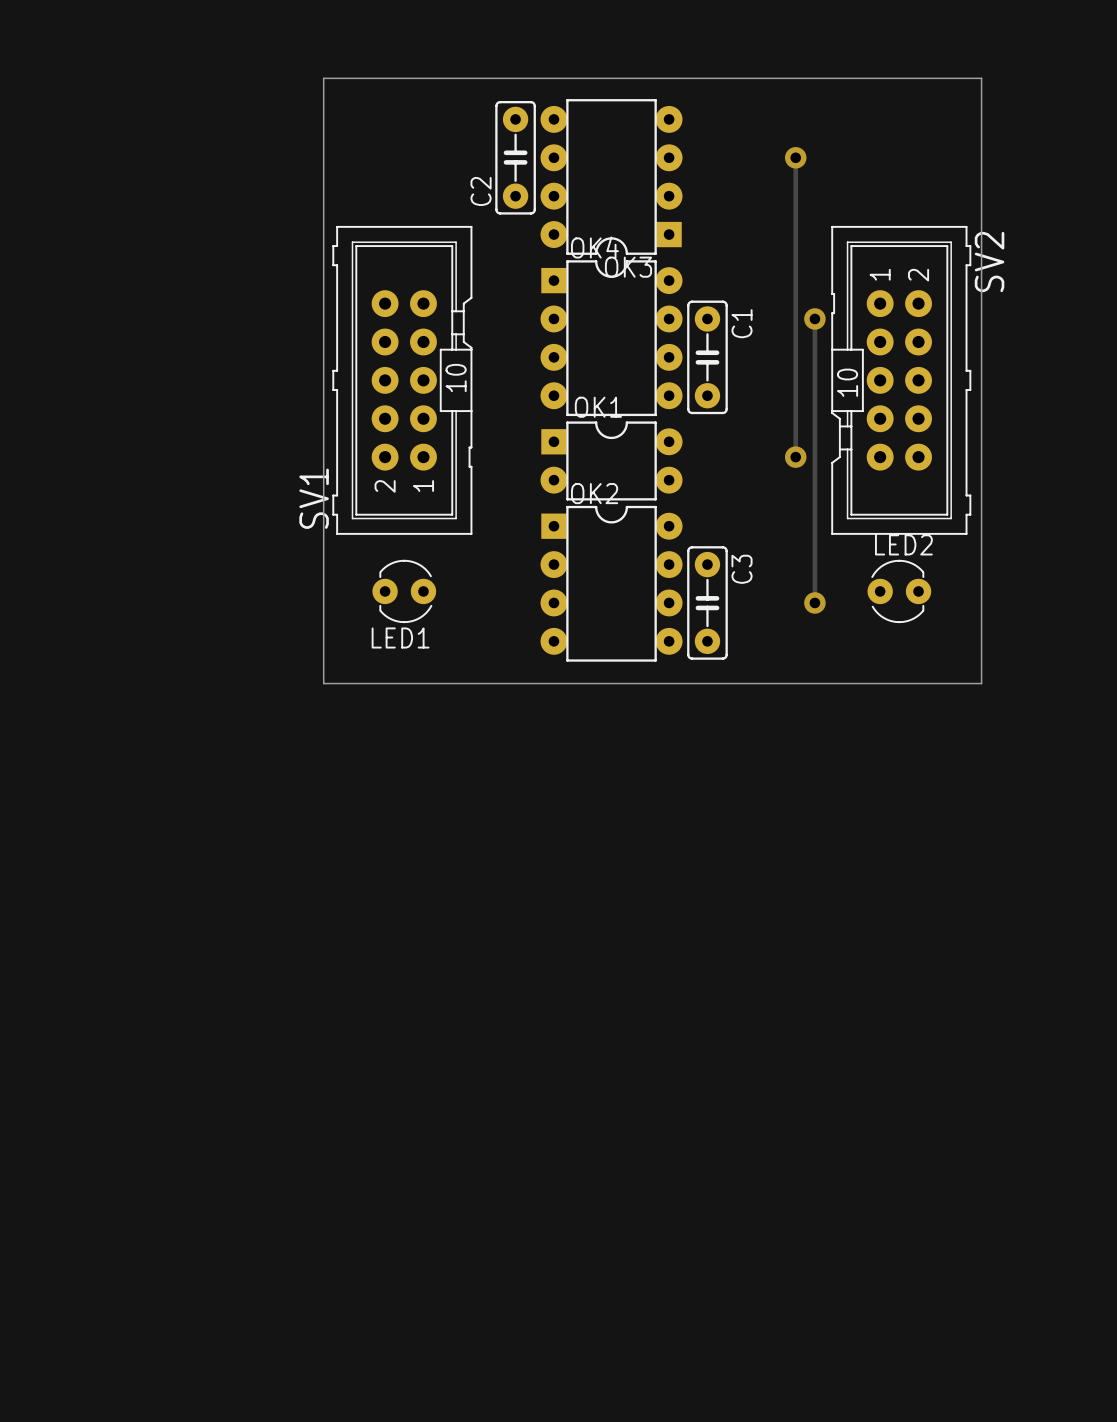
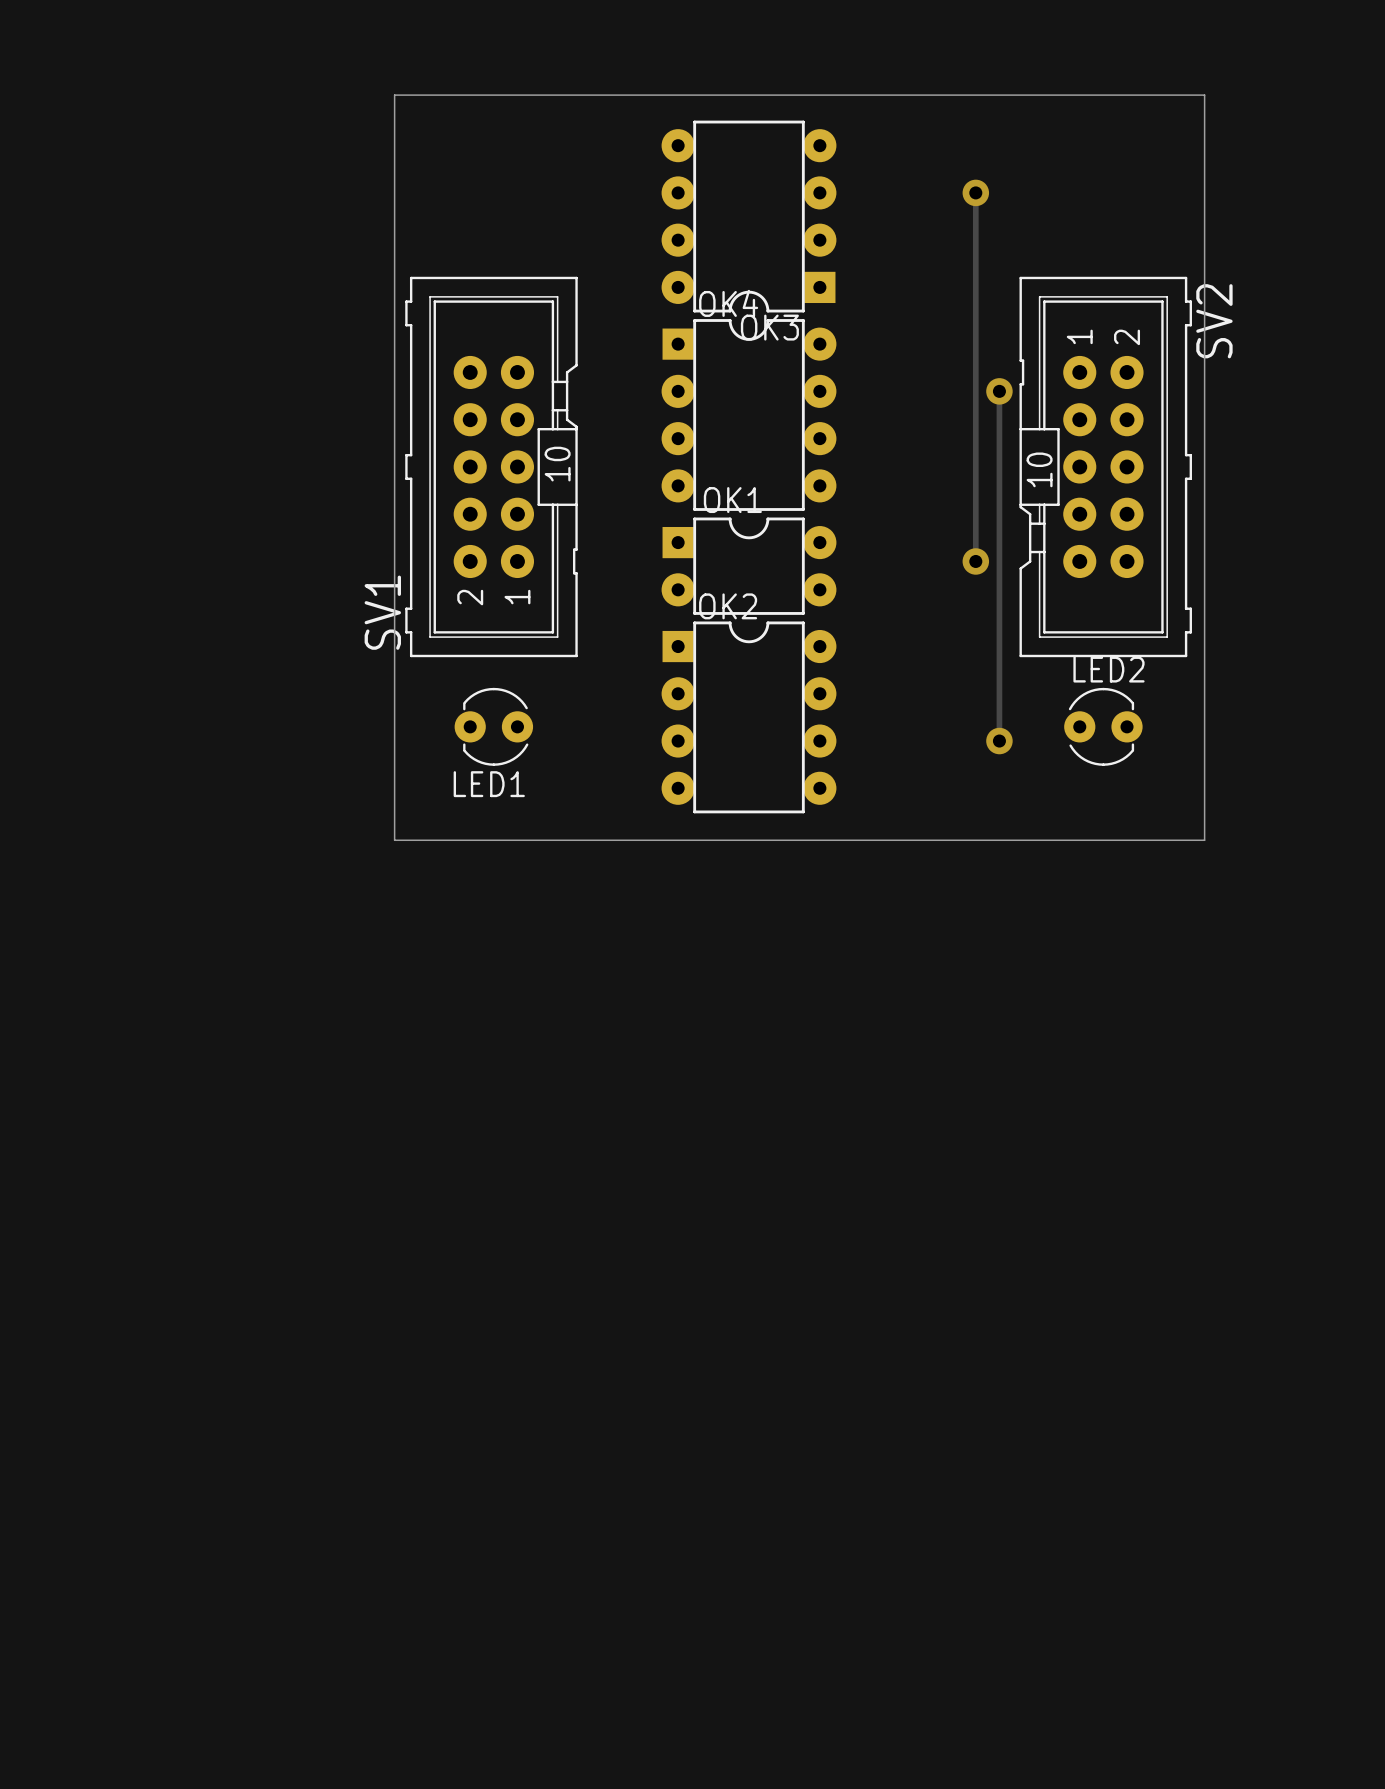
C2: (515, 157) -> none
C1: (707, 357) -> none
C3: (707, 602) -> none

